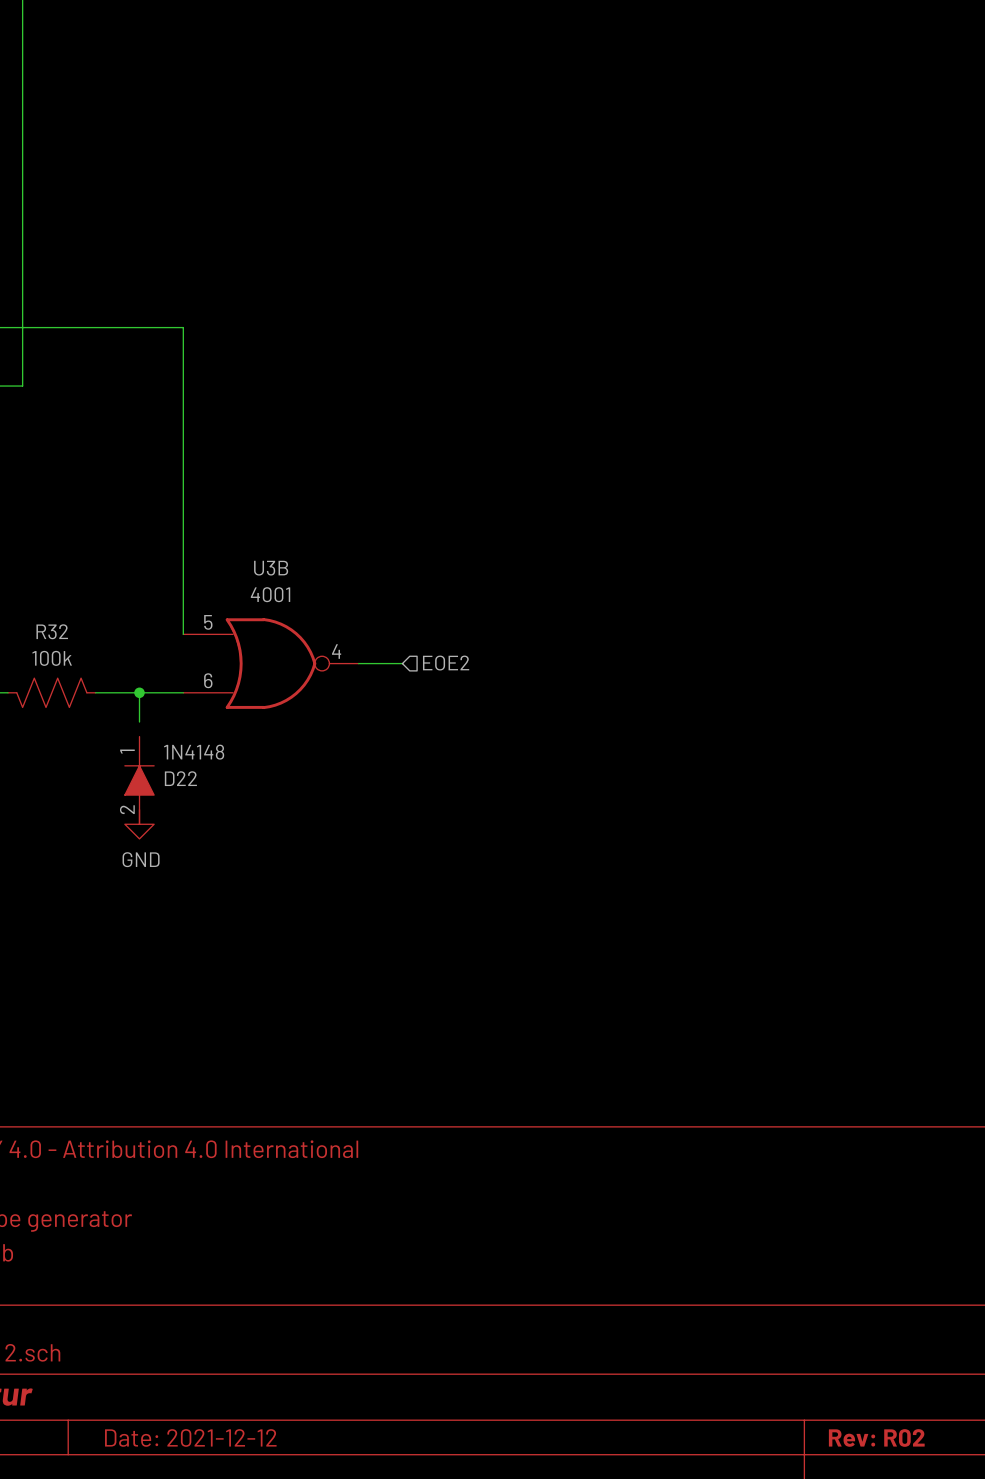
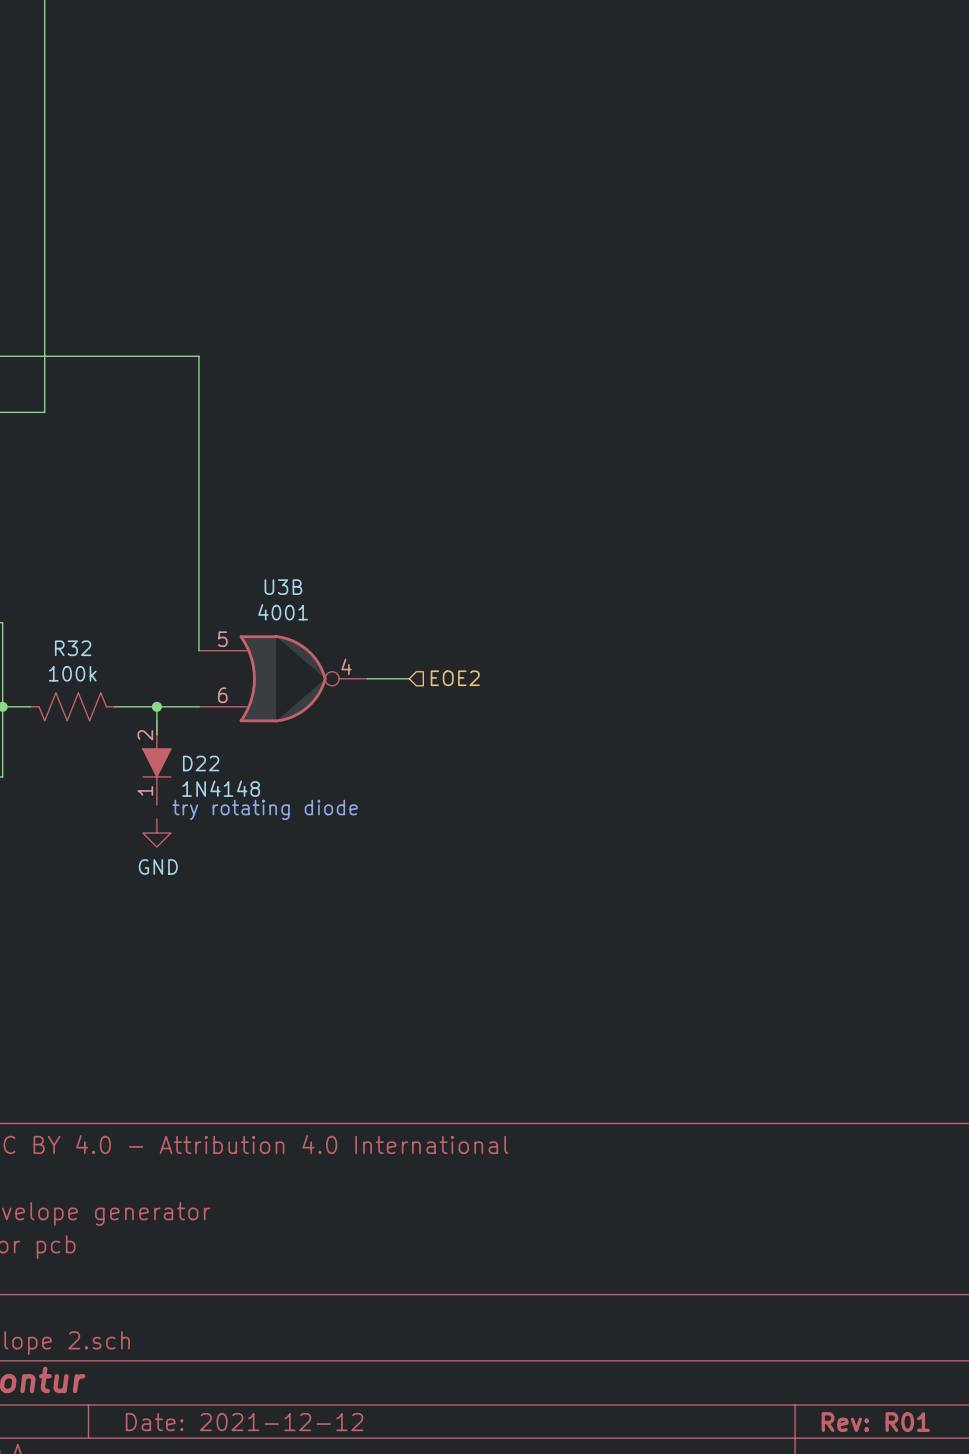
D22 value position: 1N4148 (194, 752) -> 1N4148 (221, 788)
D22 rotation: 0° (139, 780) -> 180° (156, 762)
text: none -> try rotating diode (265, 809)
title block: Rev: R02 (876, 1437) -> Rev: R01 (875, 1422)

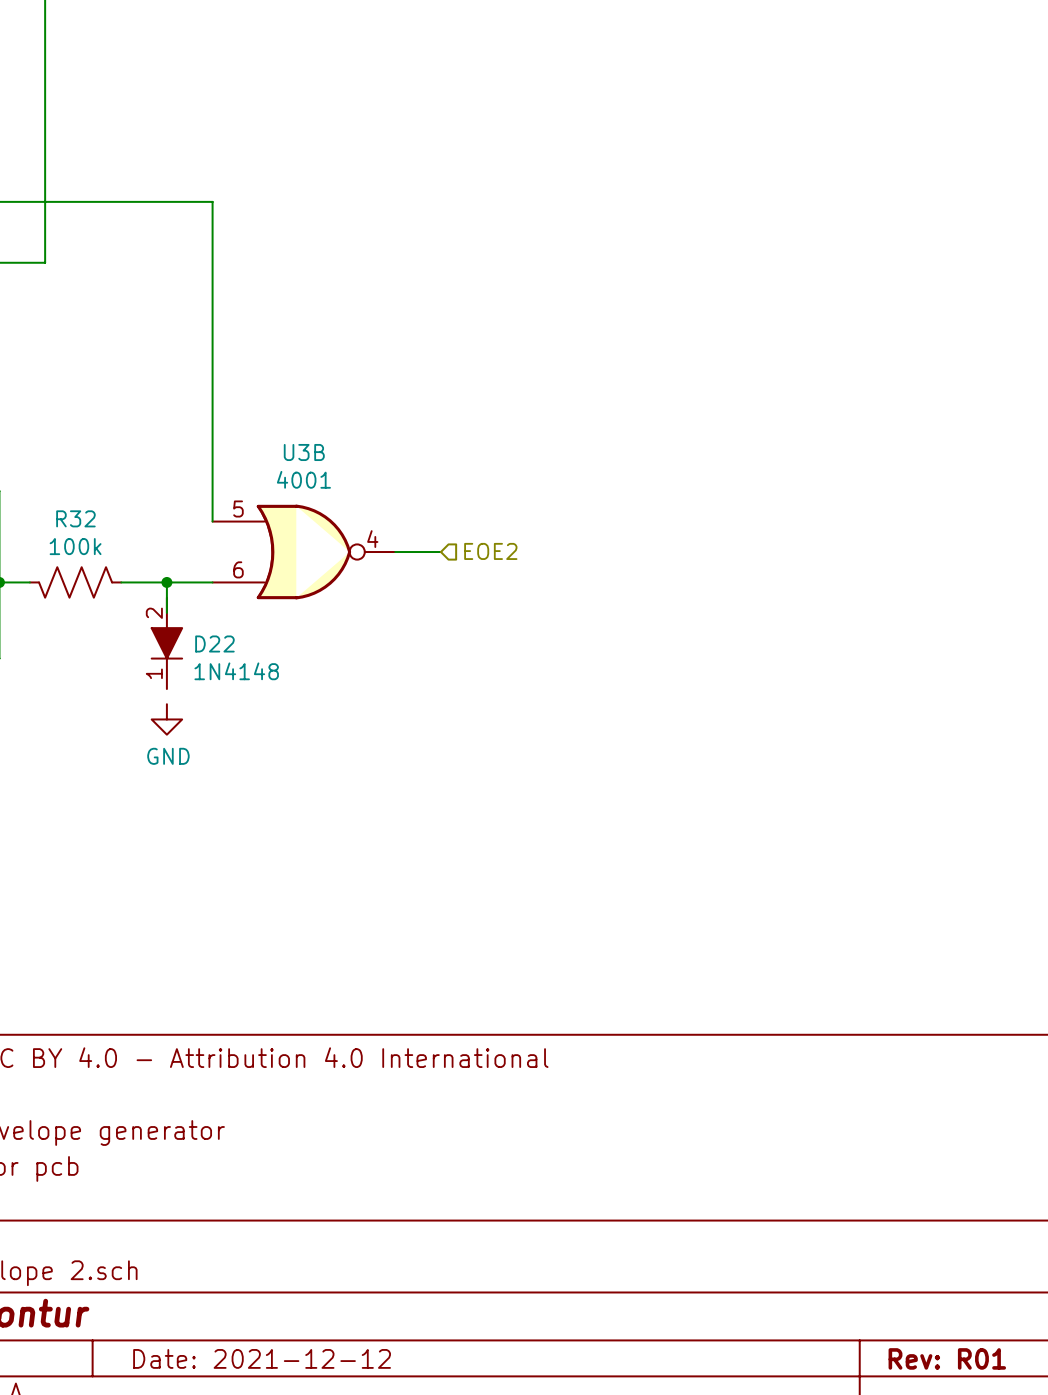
text: try rotating diode (265, 809) -> none

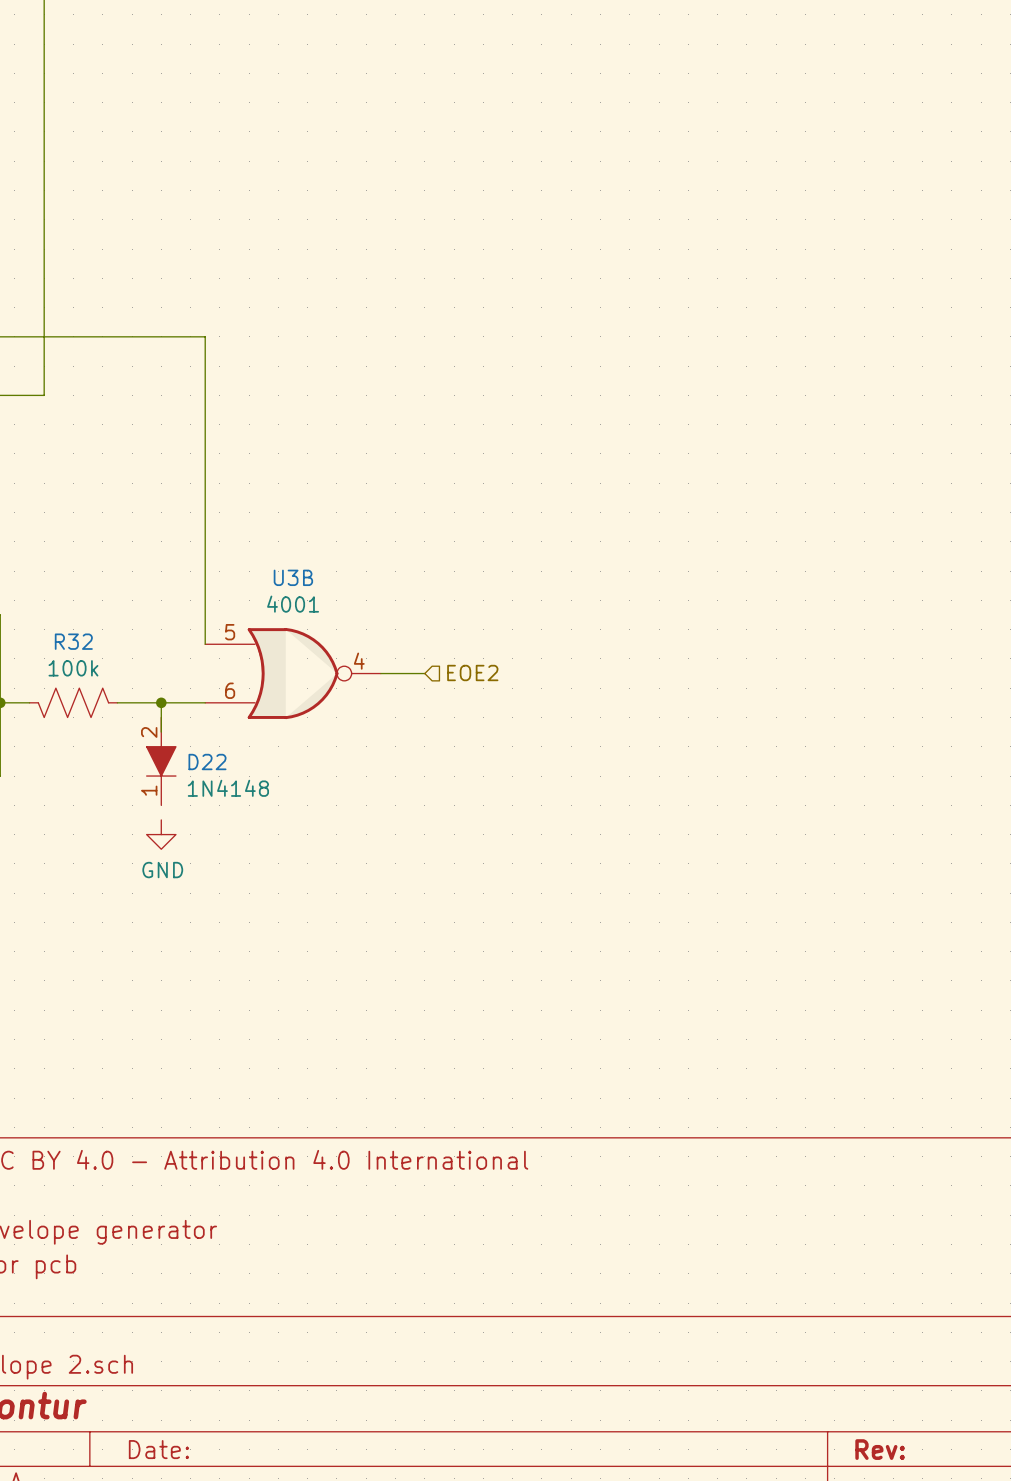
title block: Date: 2021-12-12 (262, 1358) -> Date: (158, 1449)
title block: Rev: R01 (947, 1358) -> Rev: (880, 1449)

